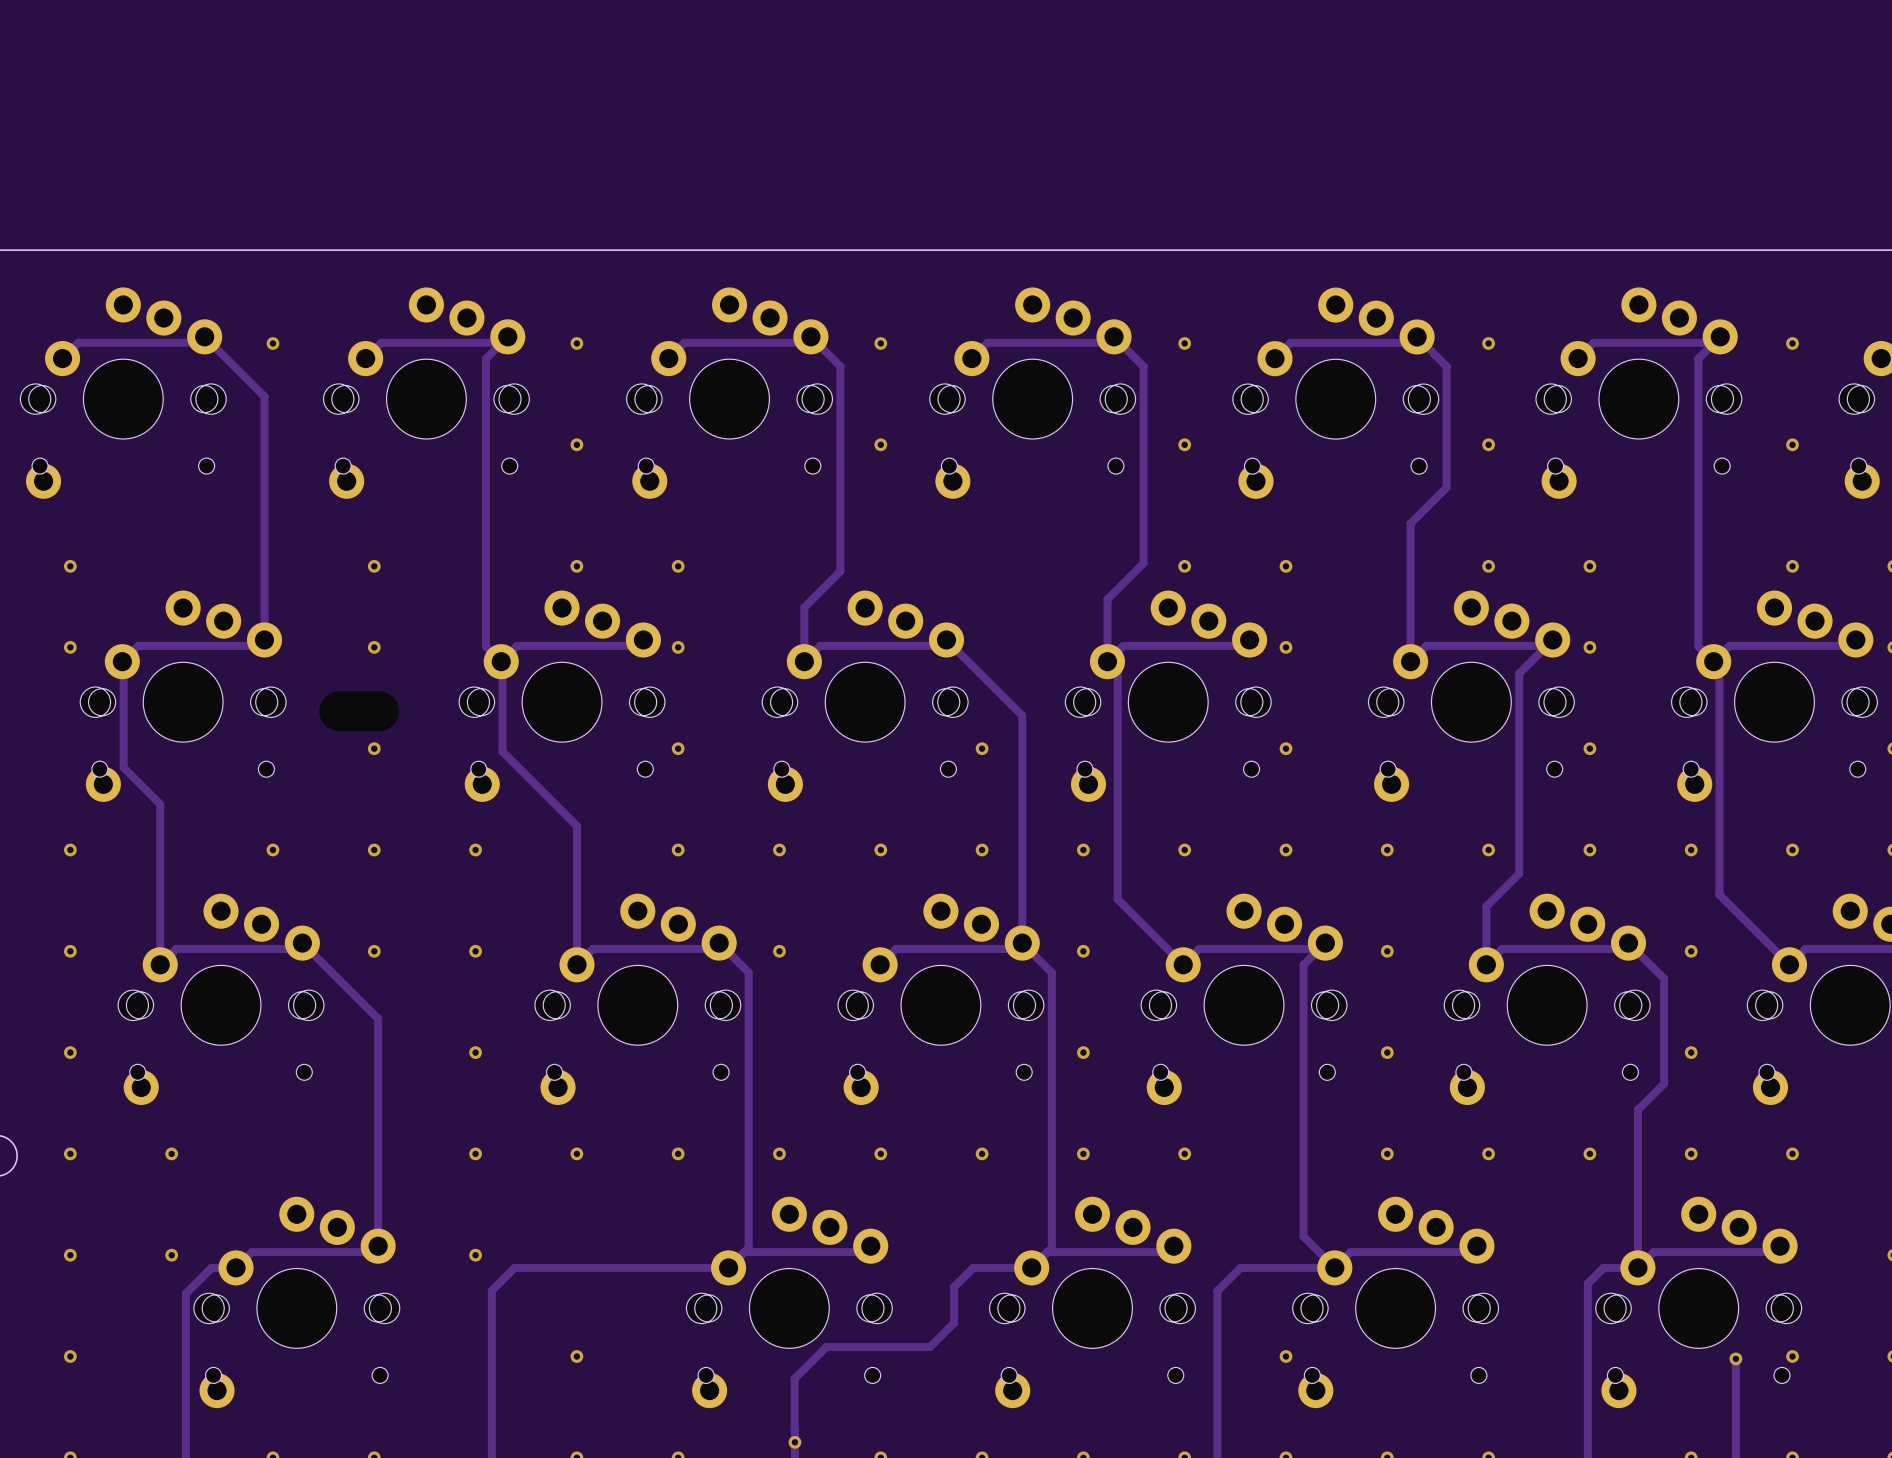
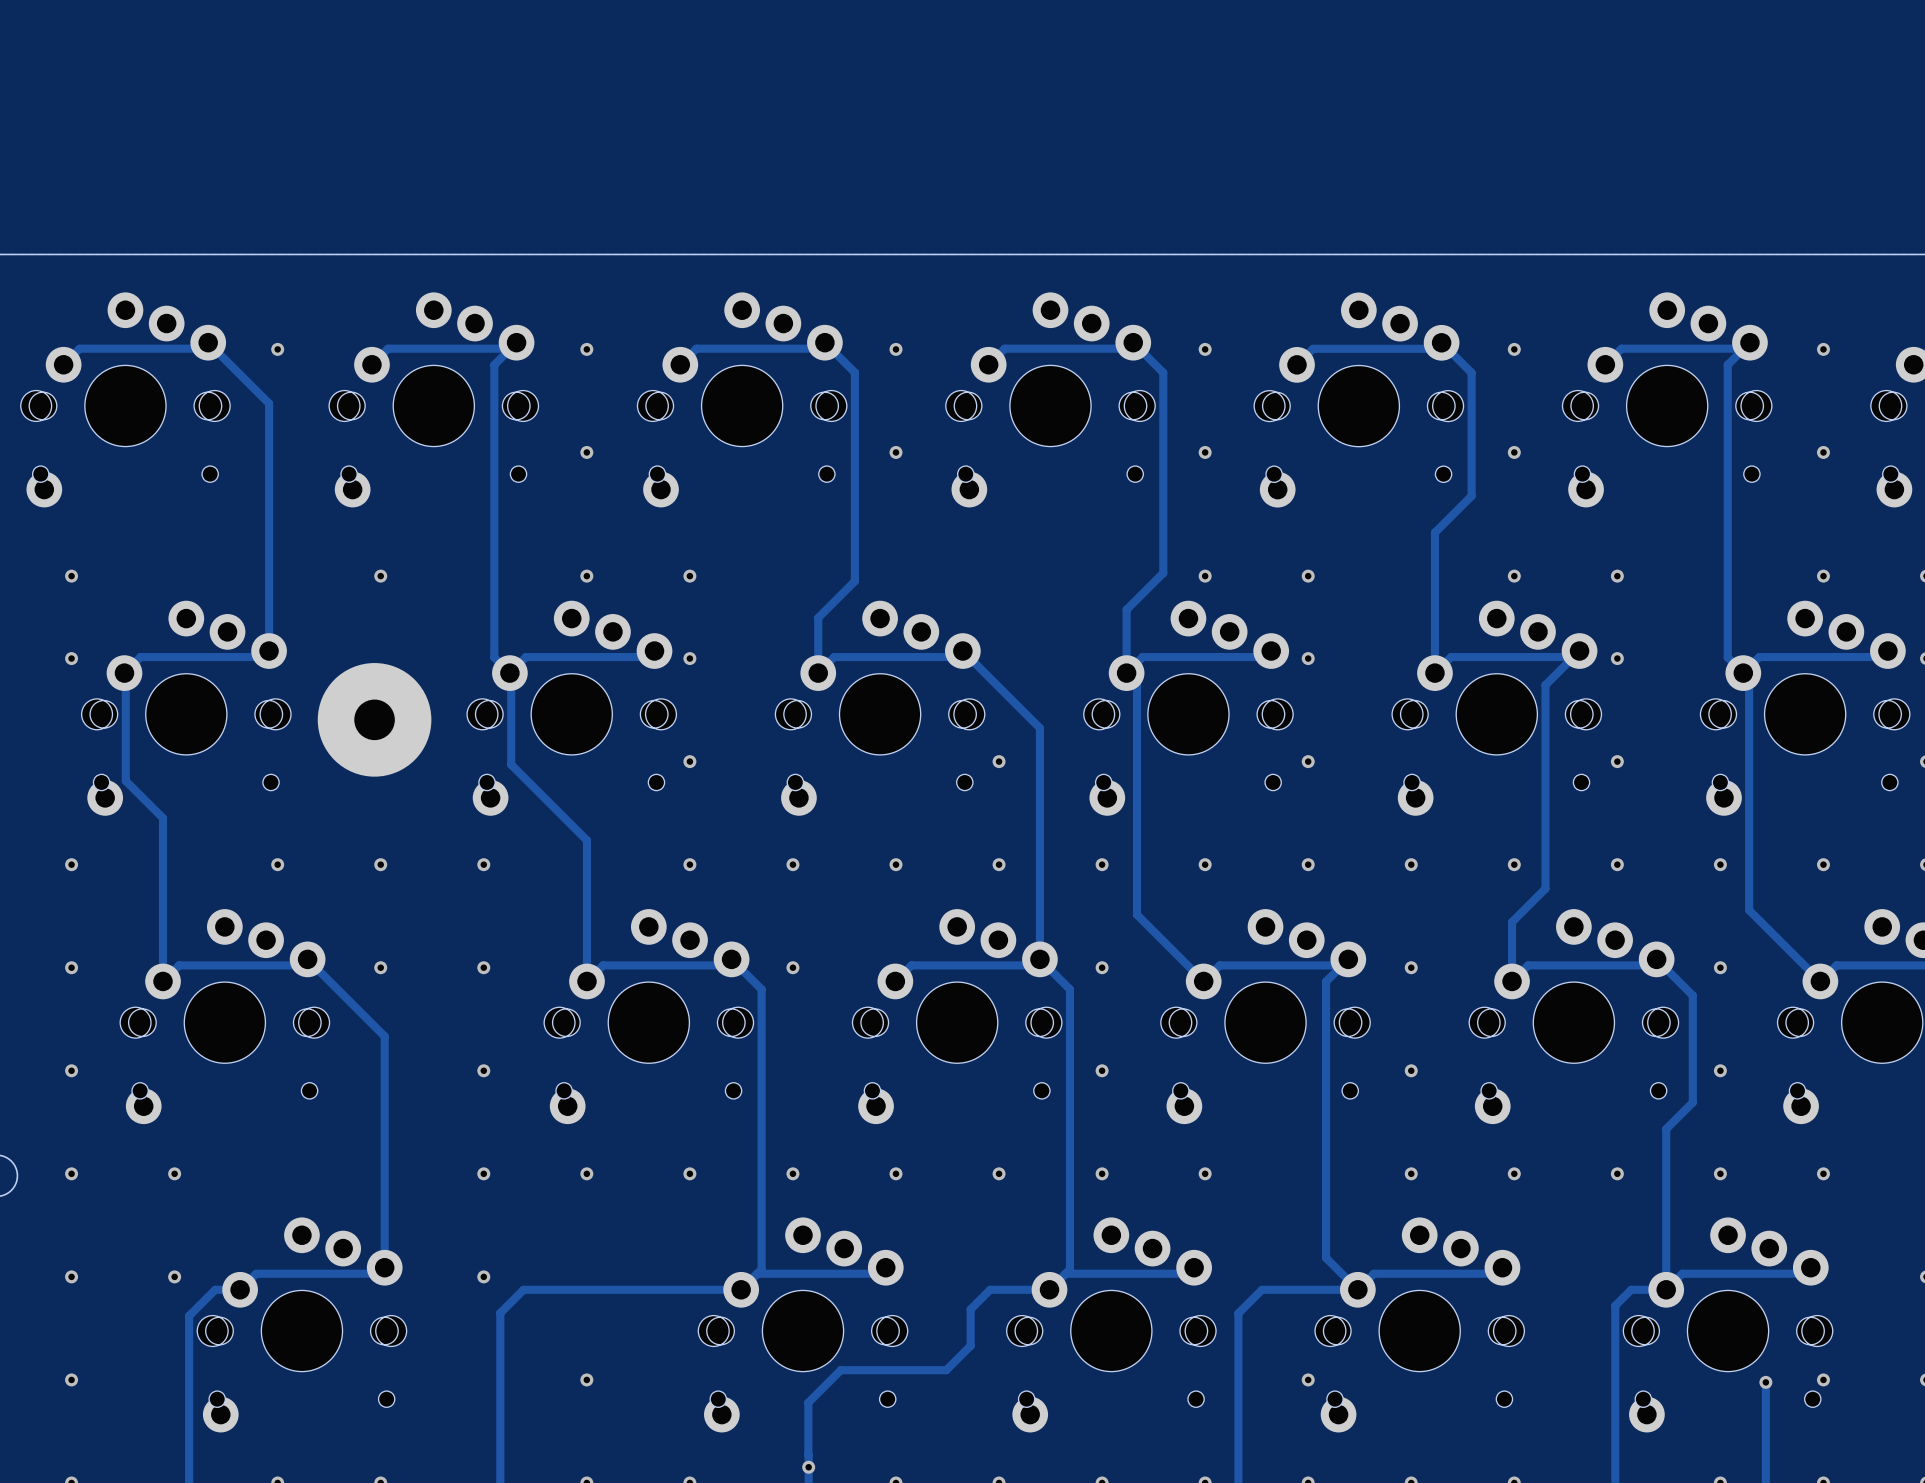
via: (374, 647) -> none
part footprint: [319, 691, 400, 732] -> [317, 663, 432, 777]
via: (374, 748) -> none

